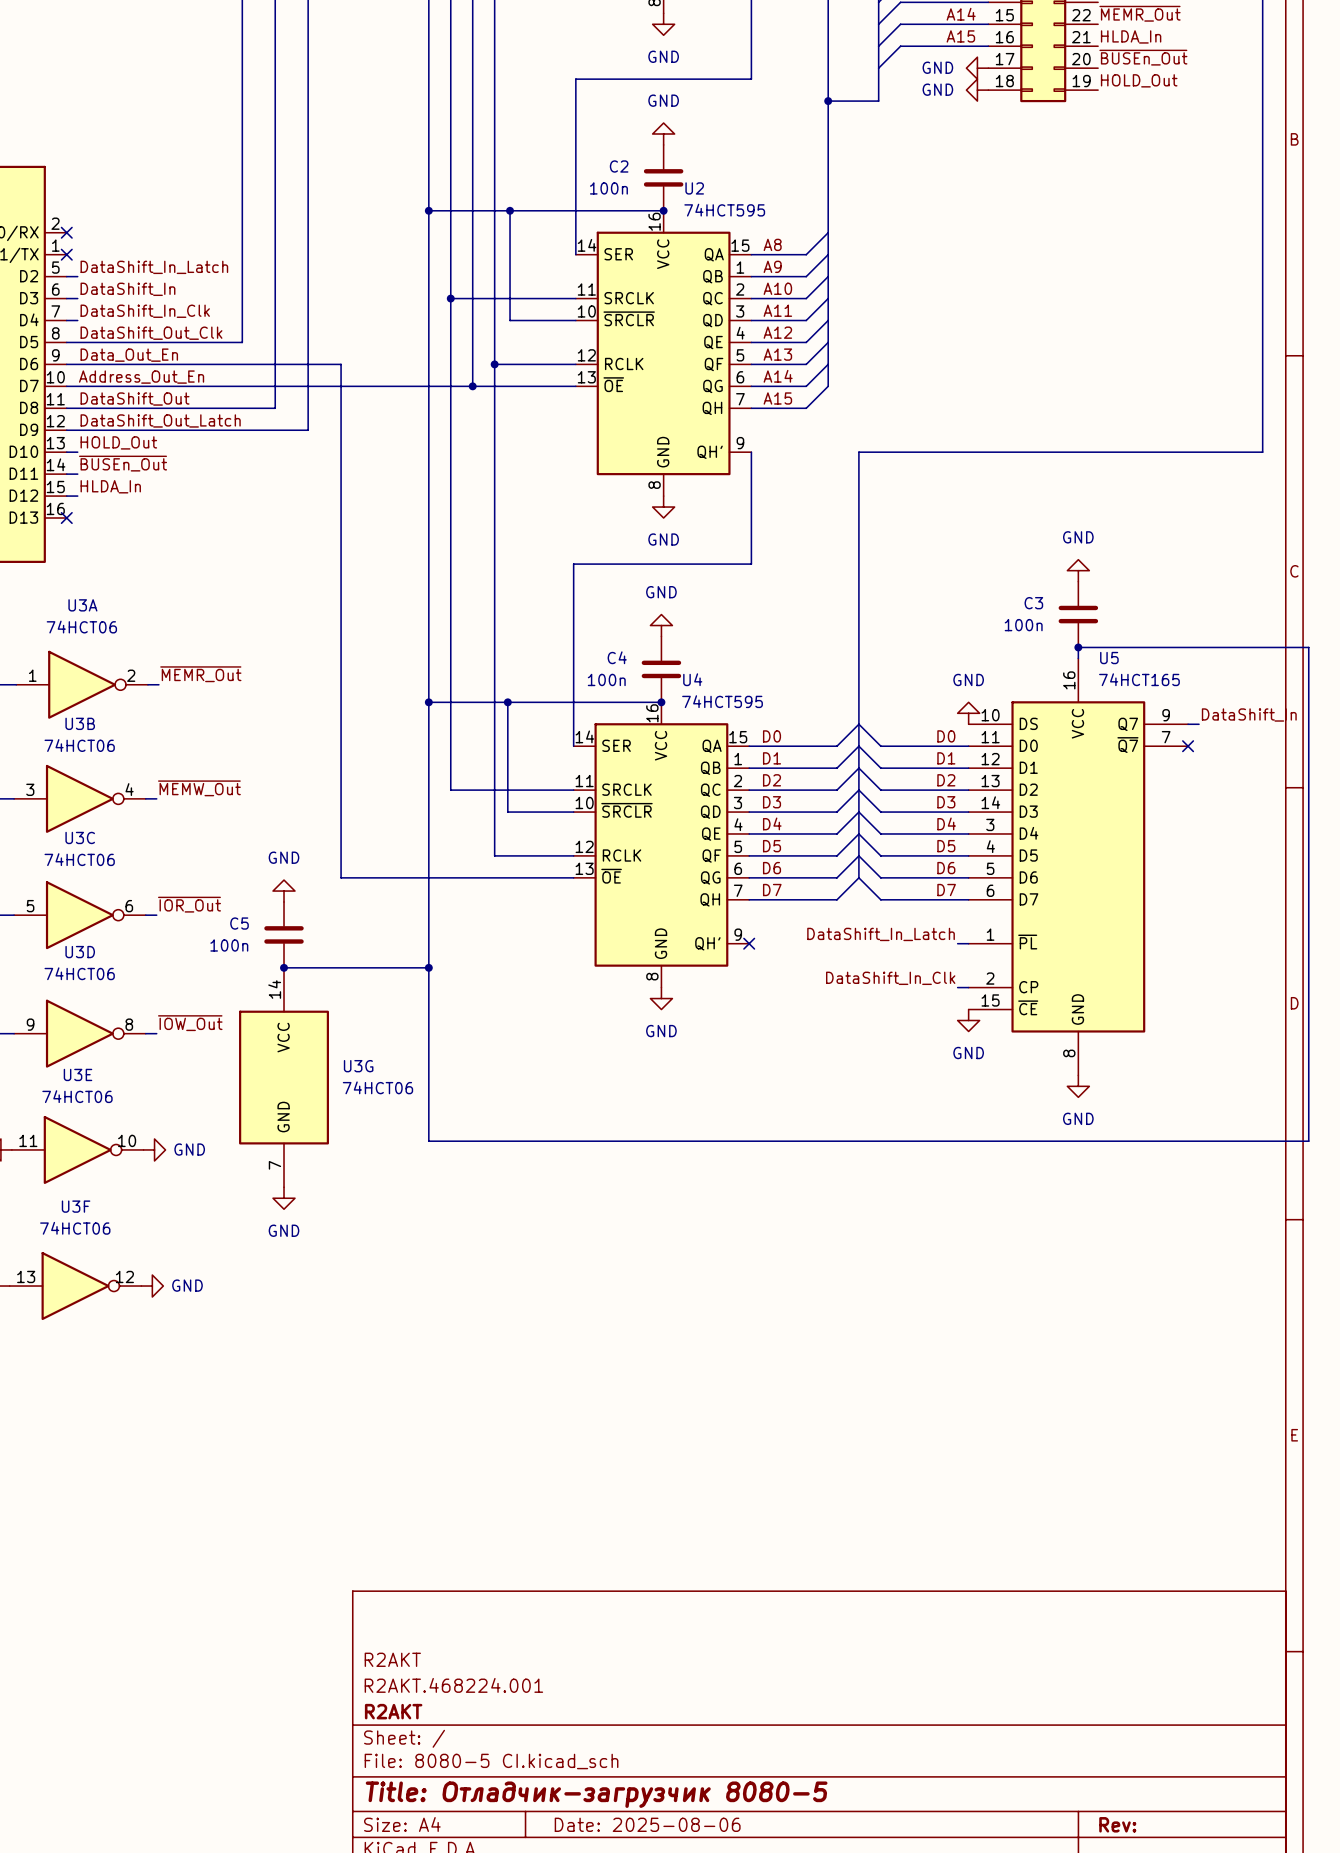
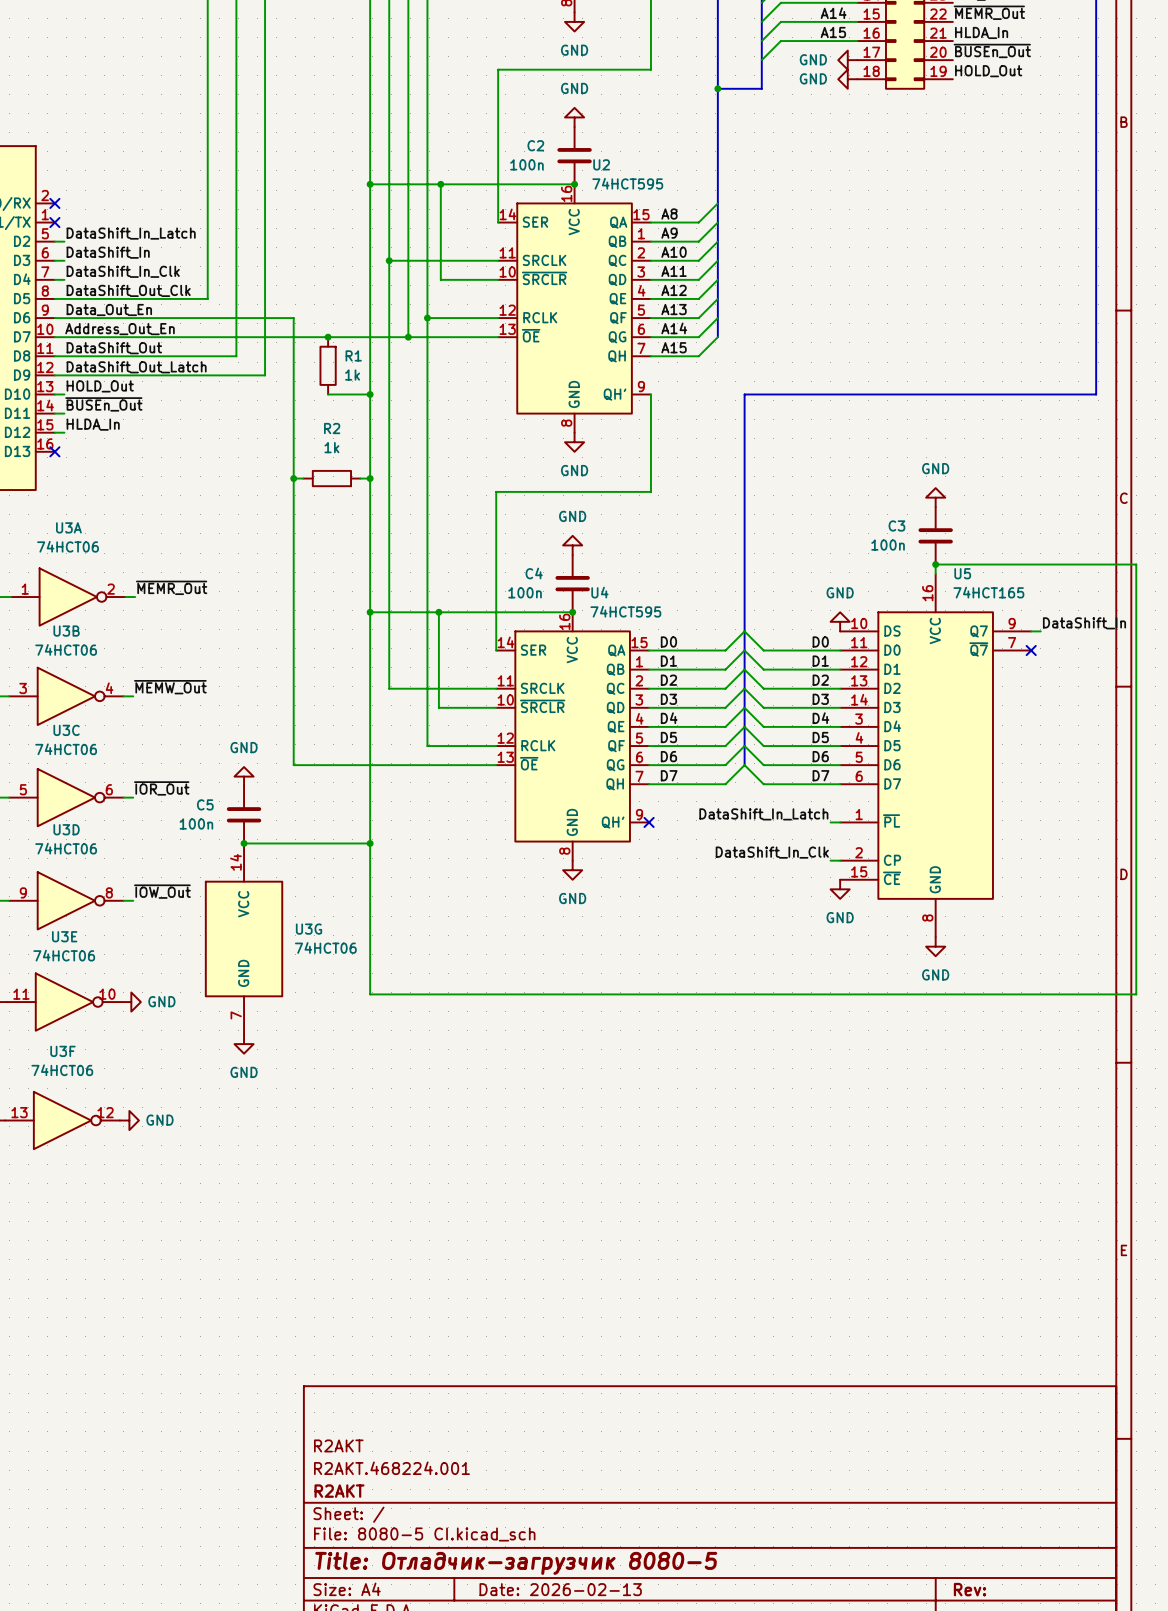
junction: none -> (328, 337)
R1: none -> 1k (328, 365)
wire: none -> (328, 394) (370, 394)
junction: none -> (370, 394)
wire: none -> (293, 478) (303, 478)
junction: none -> (293, 478)
R2: none -> 1k (331, 478)
wire: none -> (360, 478) (370, 478)
junction: none -> (370, 478)
title block: Date: 2025-08-06 (647, 1824) -> Date: 2026-02-13 (560, 1589)

